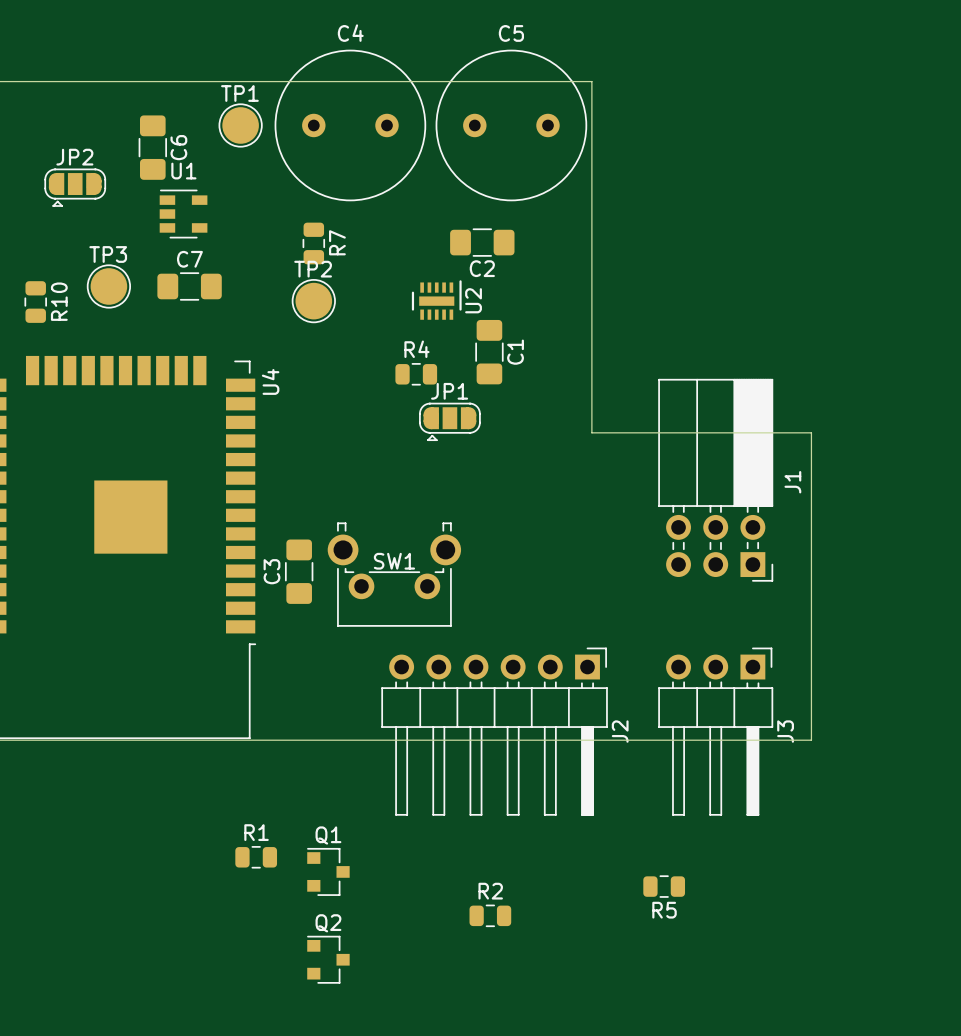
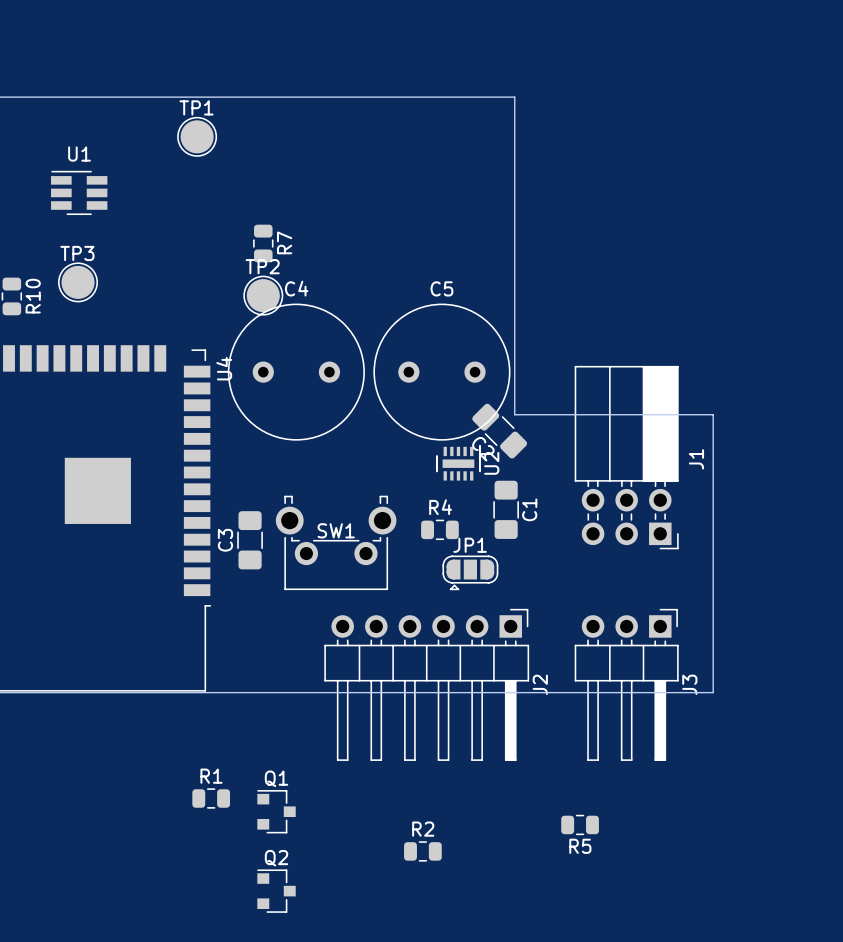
C4 position: (350, 125) -> (296, 372)
C5 position: (511, 125) -> (441, 372)
C6: (152, 147) -> none
JP2: (75, 187) -> none
U1 footprint: [159, 189, 208, 239] -> [51, 170, 108, 216]
C2 rotation: 0° (482, 242) -> 45° clockwise (499, 431)
C2 position: (482, 242) -> (499, 431)
C7: (189, 286) -> none
U2 position: (436, 300) -> (458, 462)
C1 position: (489, 352) -> (506, 509)
R4 position: (416, 374) -> (439, 529)
JP1 position: (449, 421) -> (470, 572)

